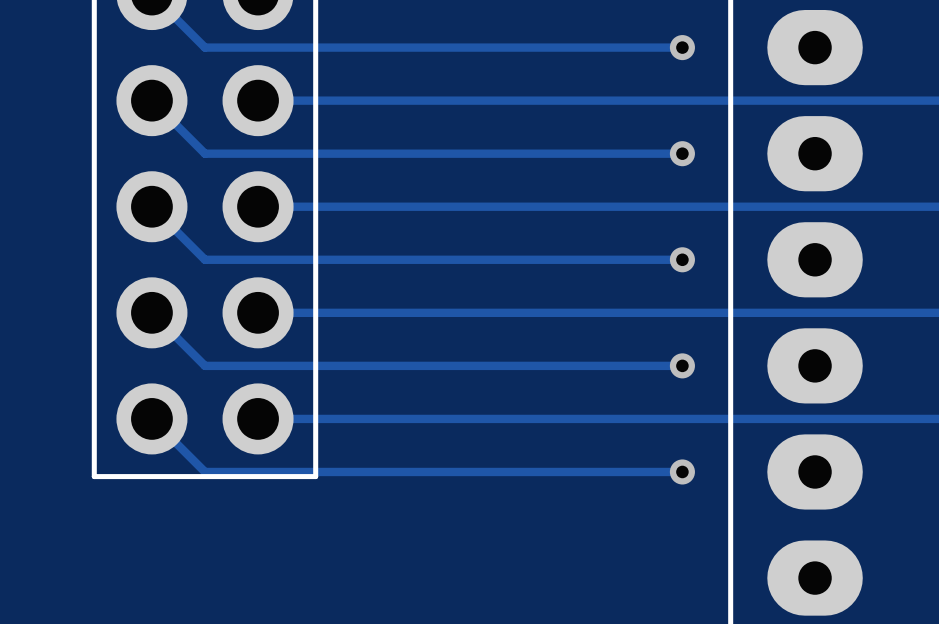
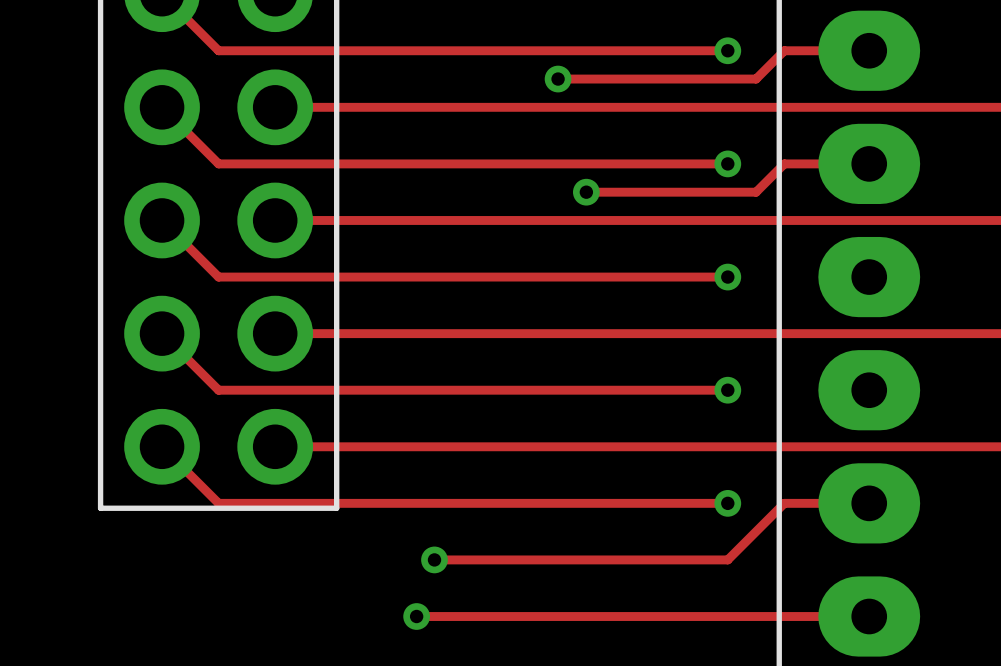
track: none -> (869, 50) (784, 50) (756, 79) (558, 79)
via: none -> (558, 79)
track: none -> (869, 163) (784, 163) (756, 192) (586, 192)
via: none -> (586, 192)
track: none -> (869, 503) (784, 503) (727, 559) (434, 559)
via: none -> (434, 559)
track: none -> (416, 616) (869, 616)
via: none -> (416, 616)

